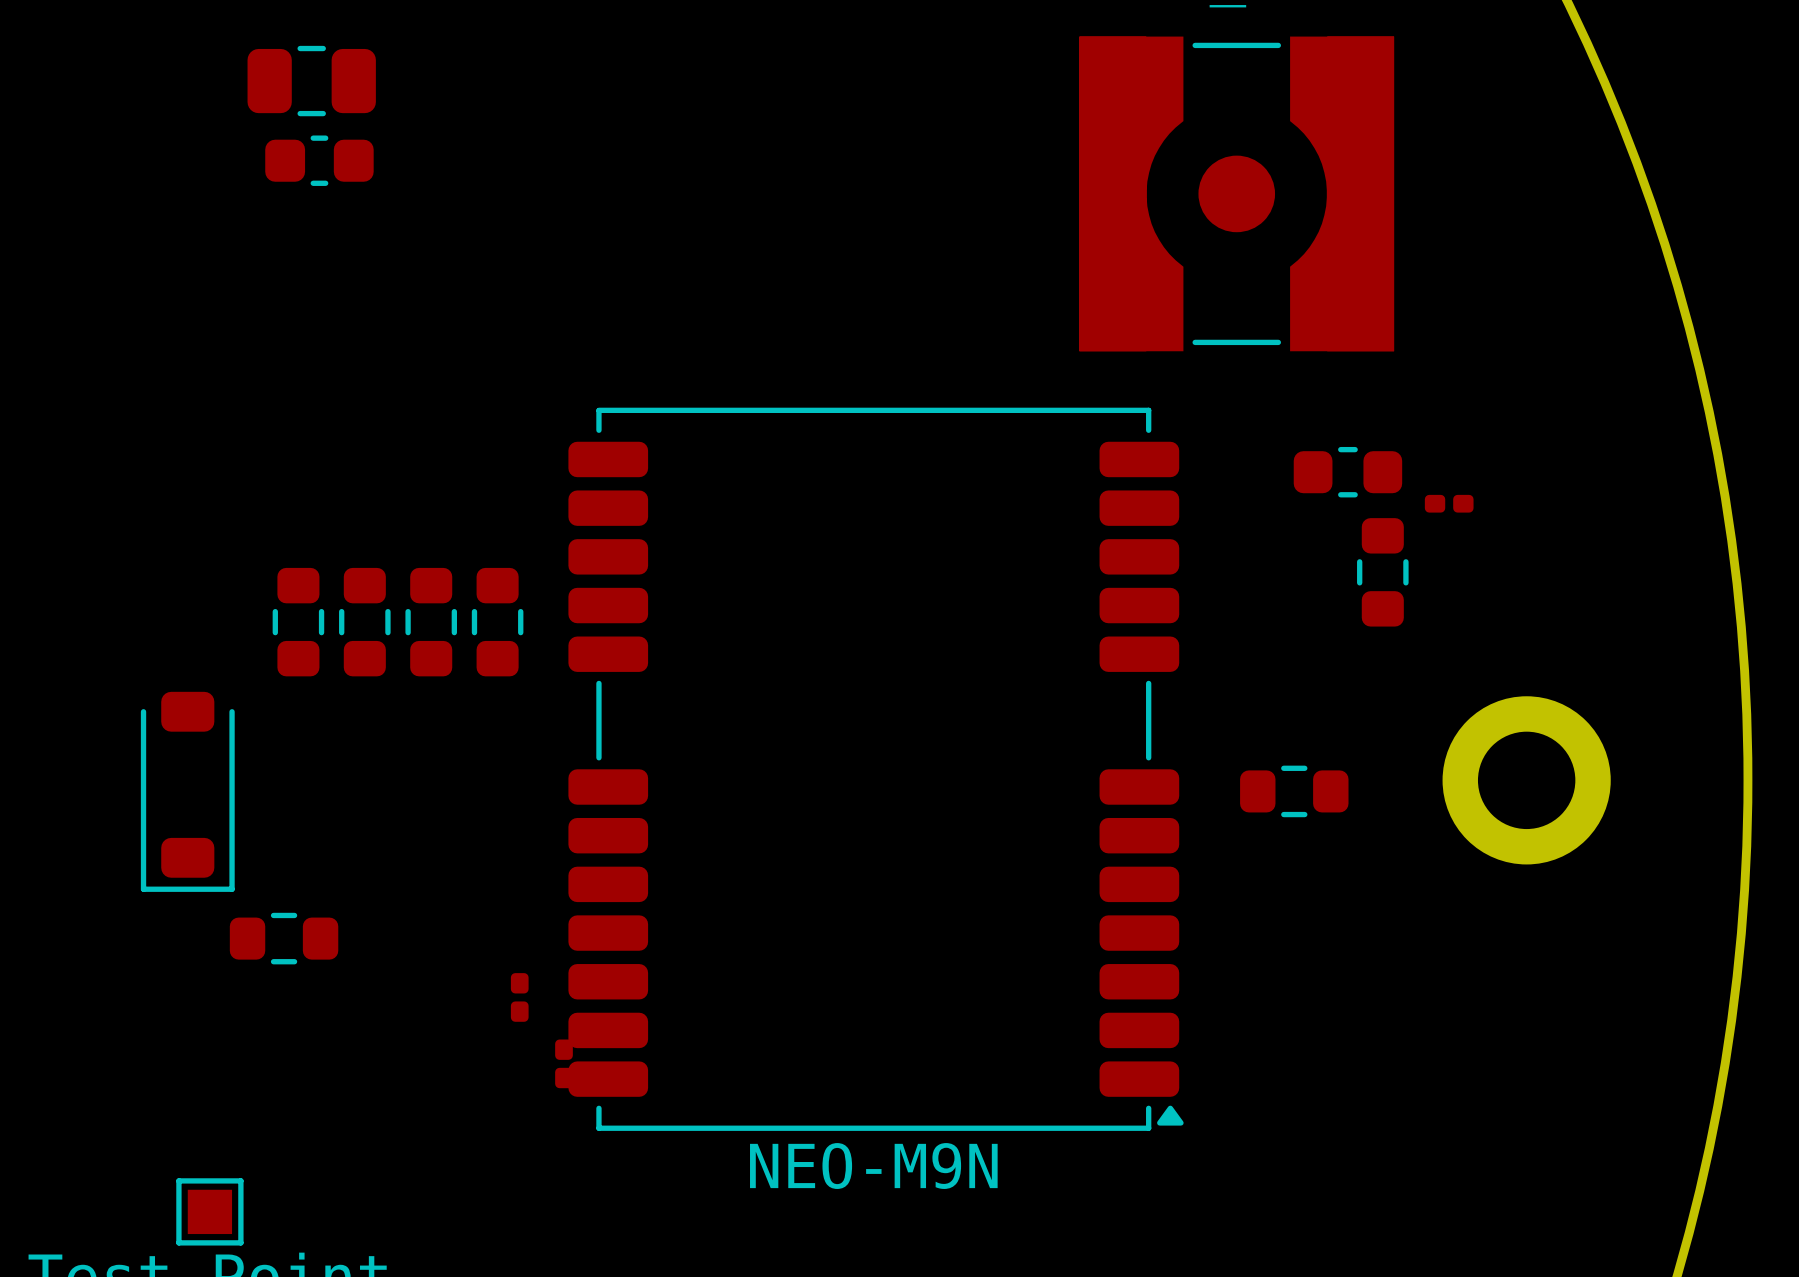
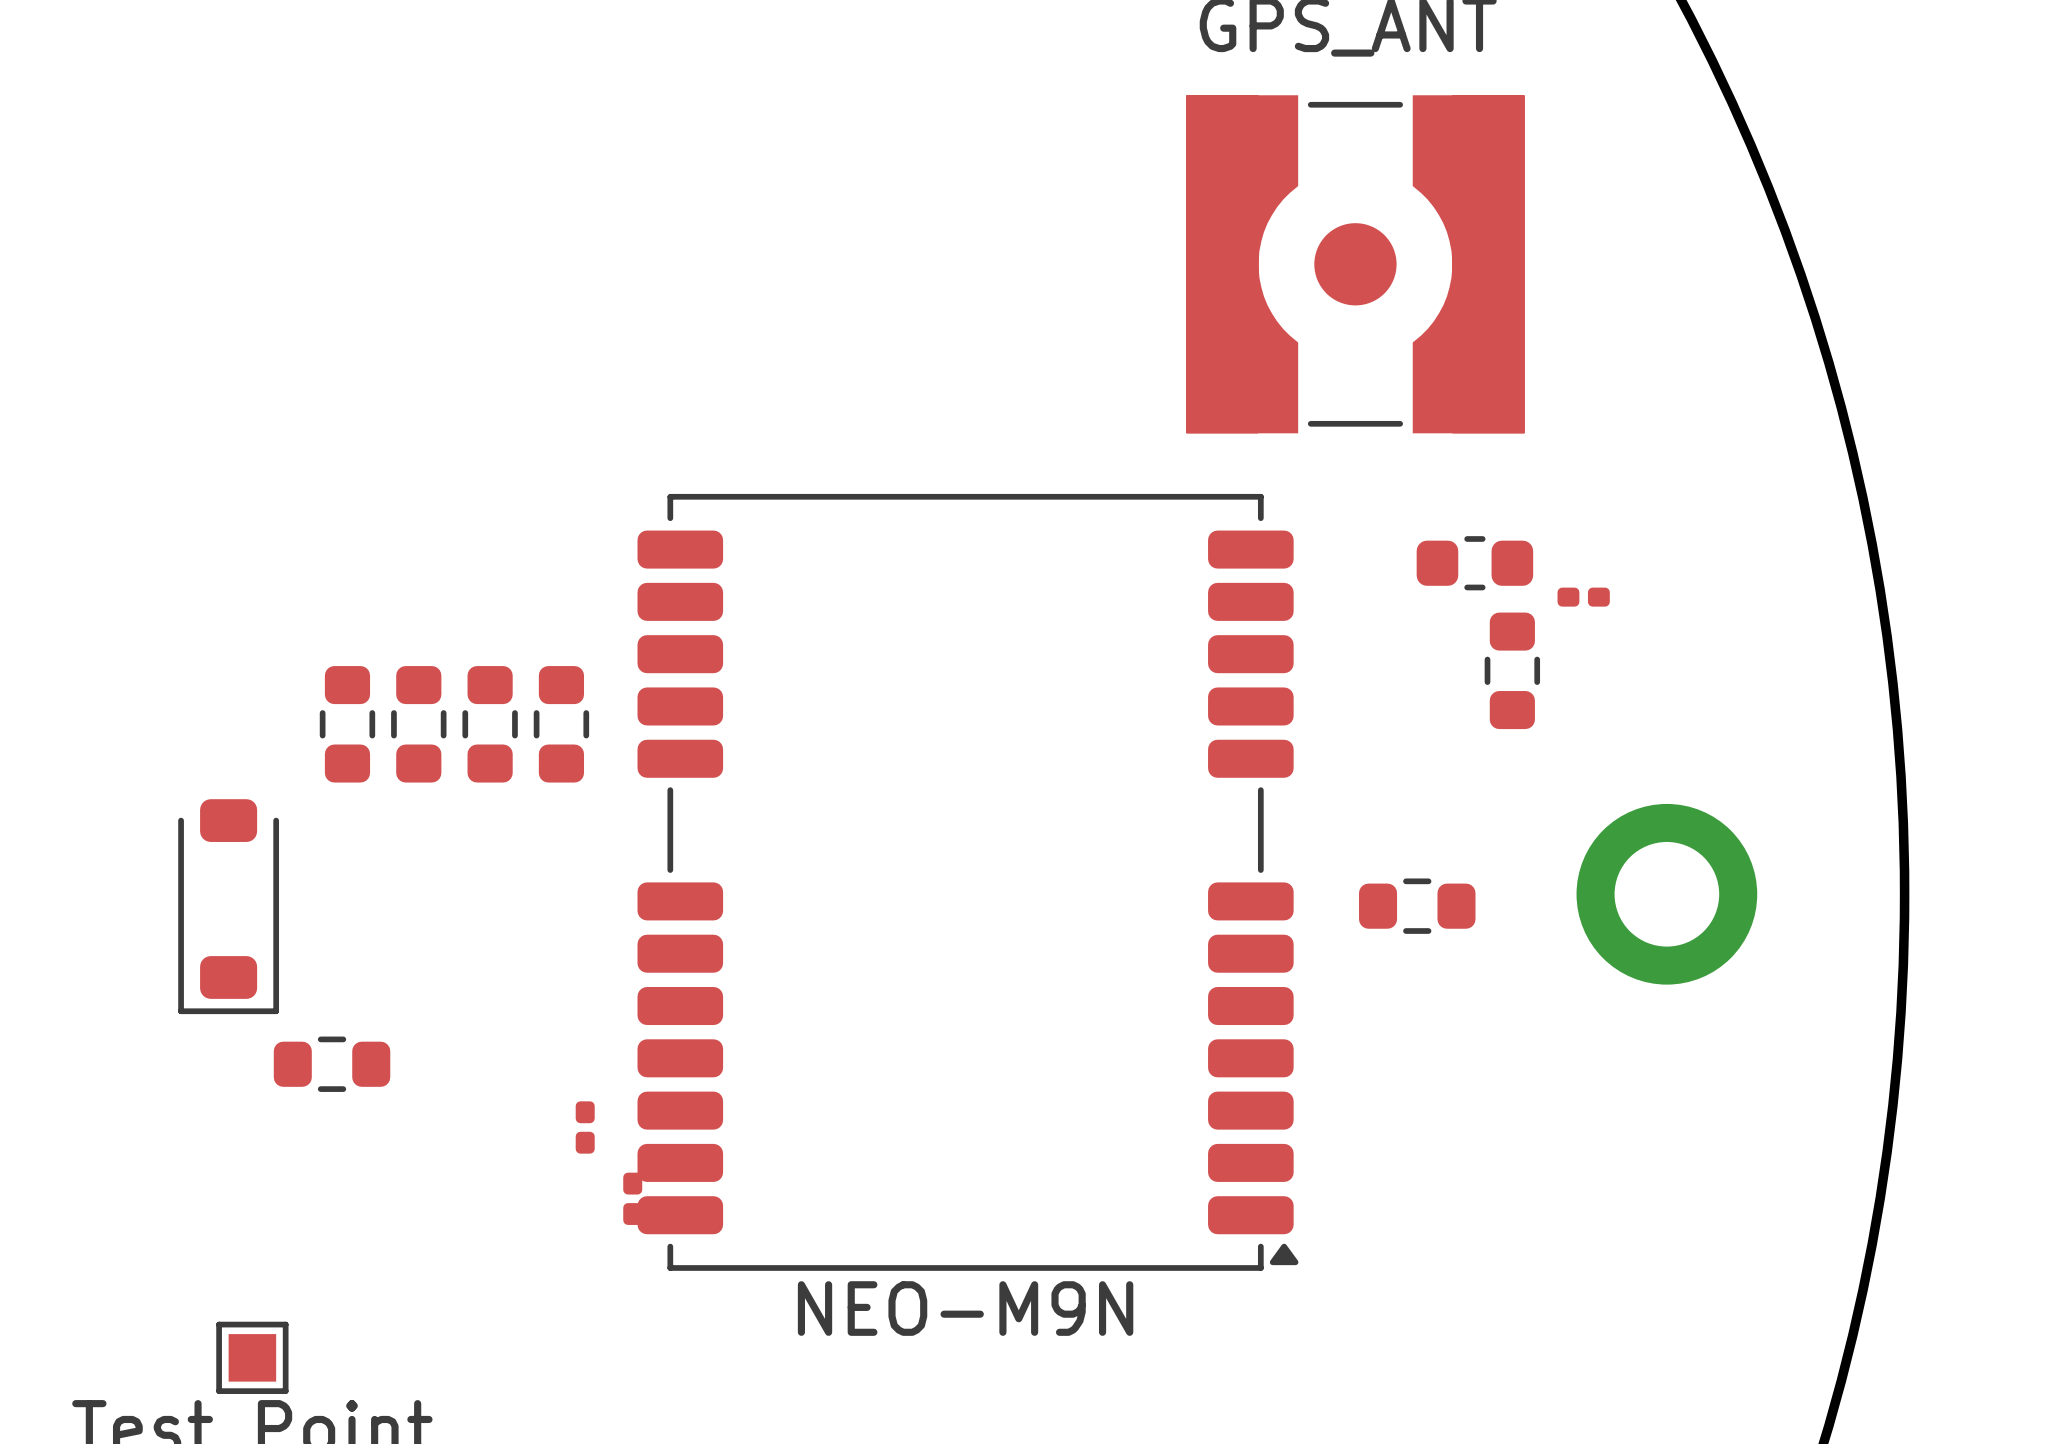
part: (311, 81) -> none
part: (319, 160) -> none

